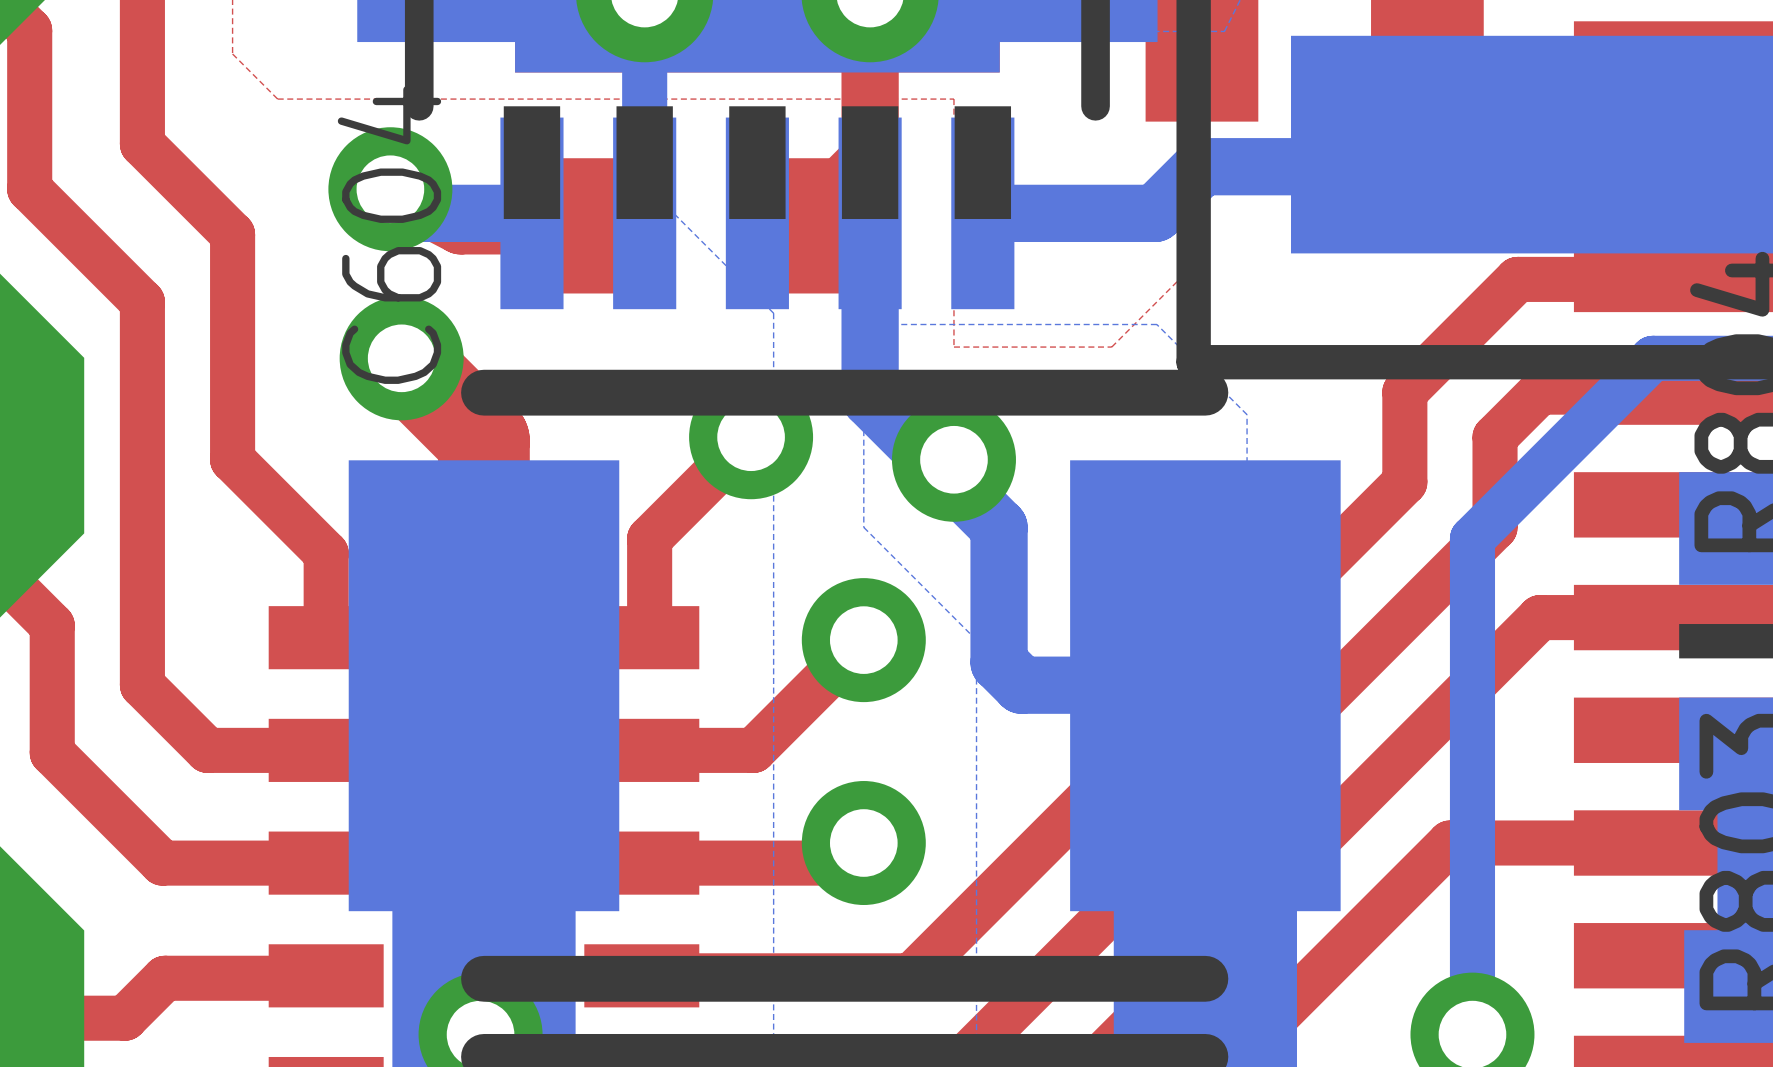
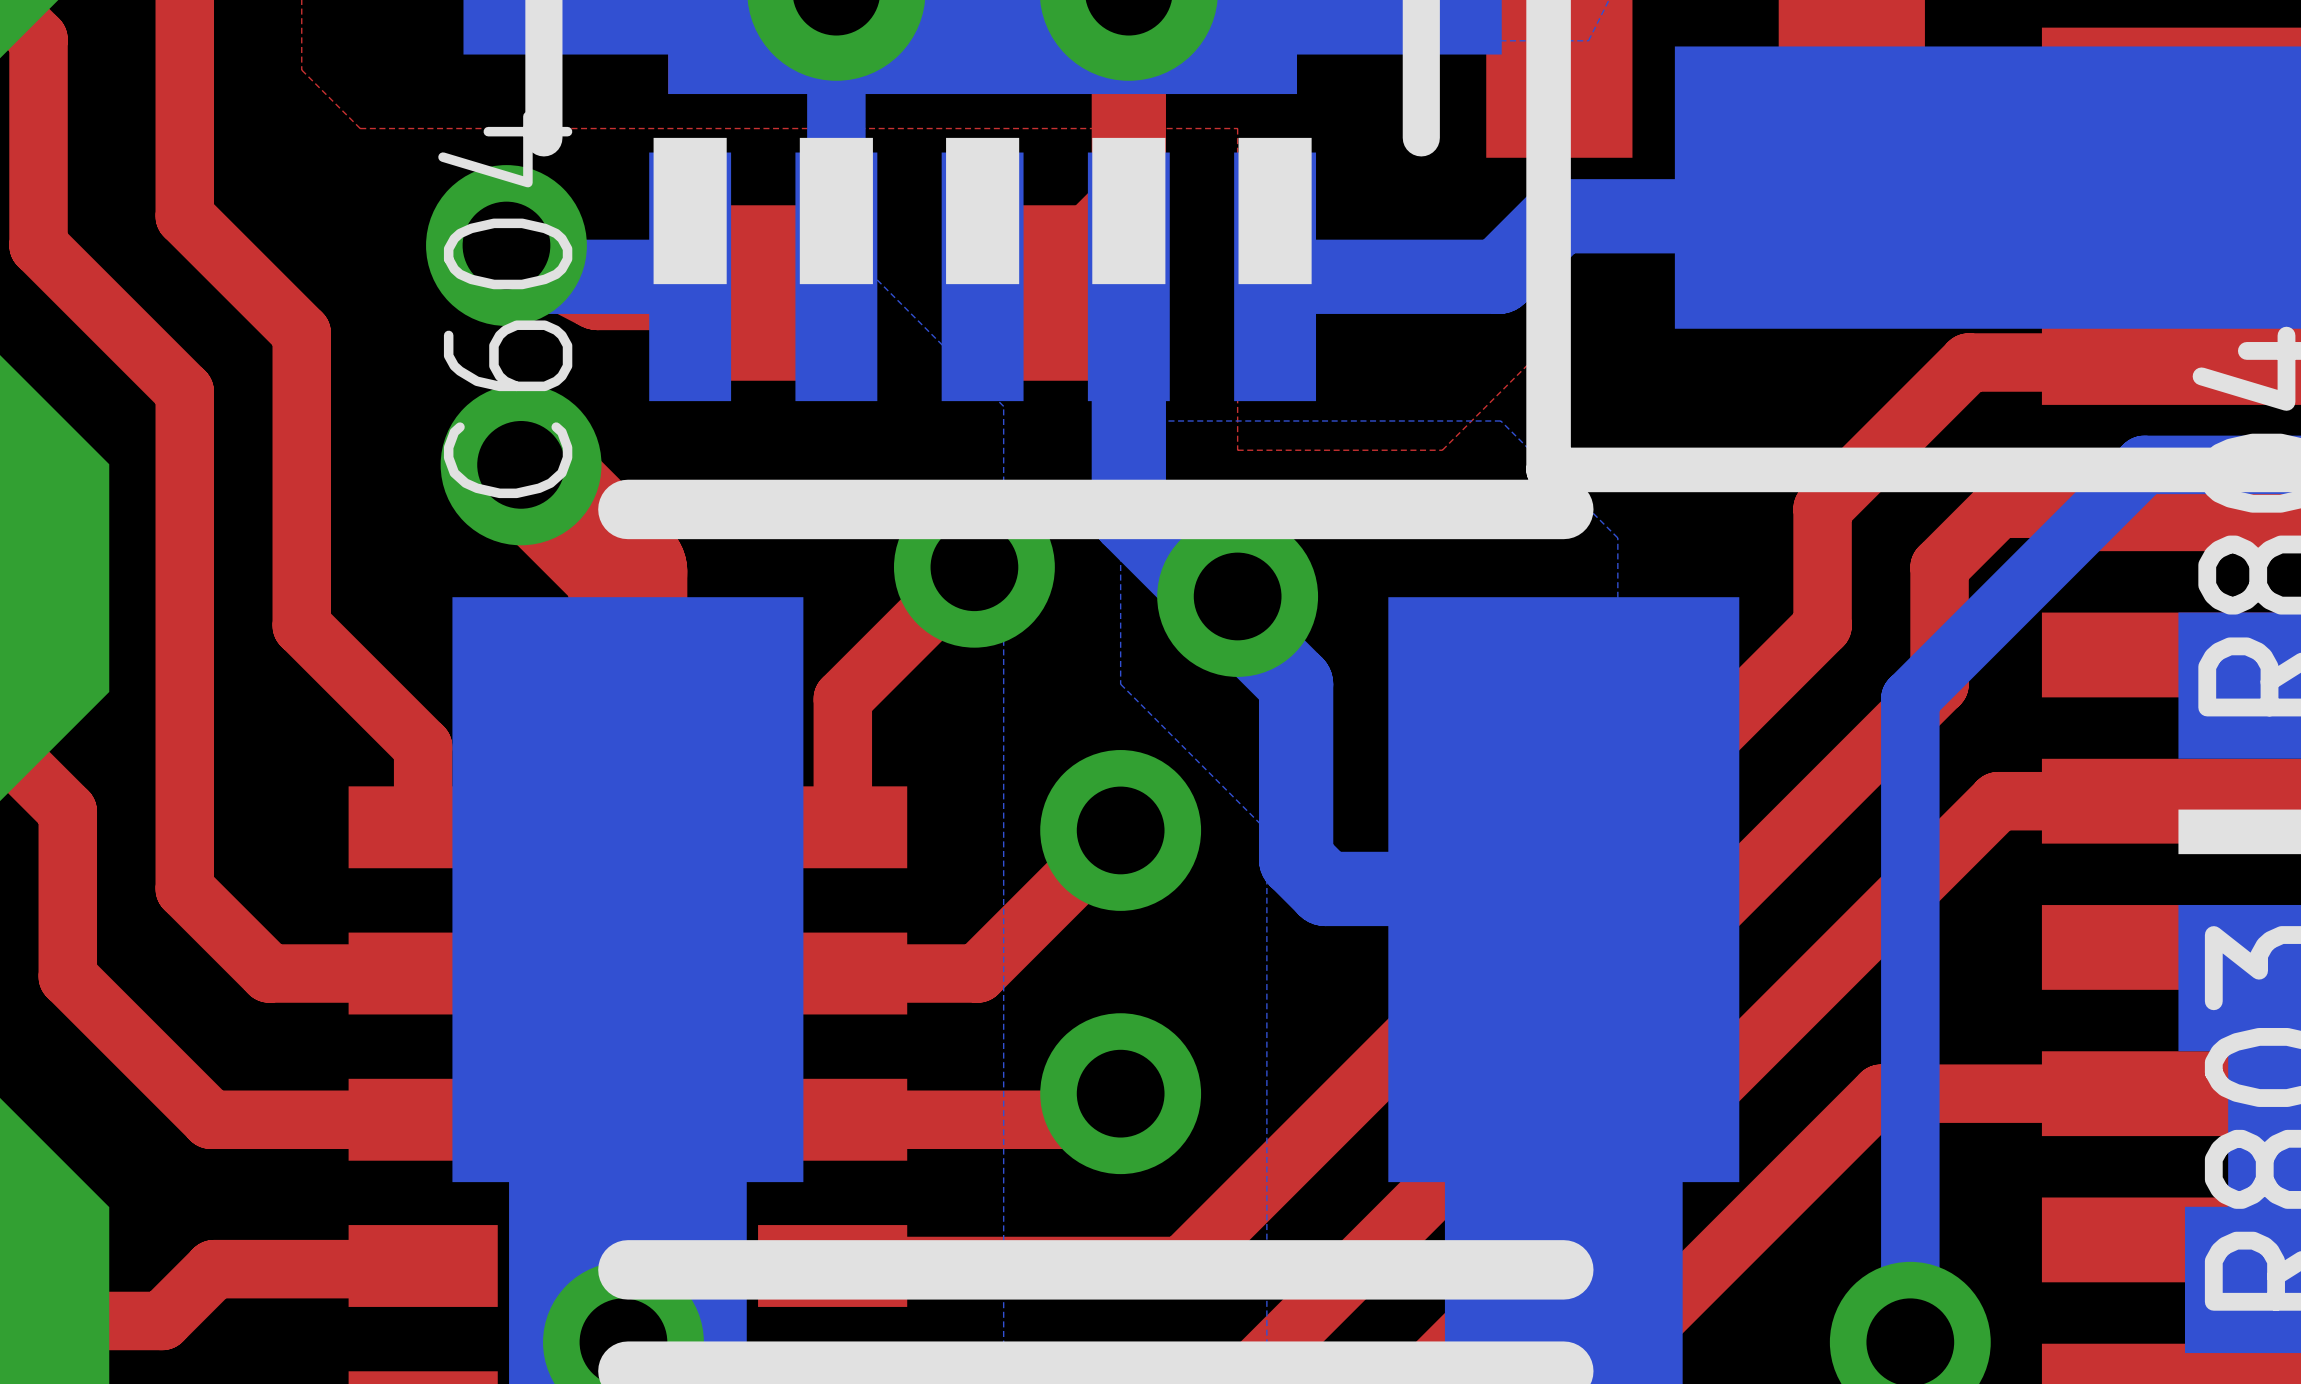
top track: (142, 144) (232, 234) (232, 256) -> (184, 187) (184, 216) (301, 333)
top track: (232, 459) (326, 553) (326, 575) -> (301, 596) (301, 625) (423, 747)

